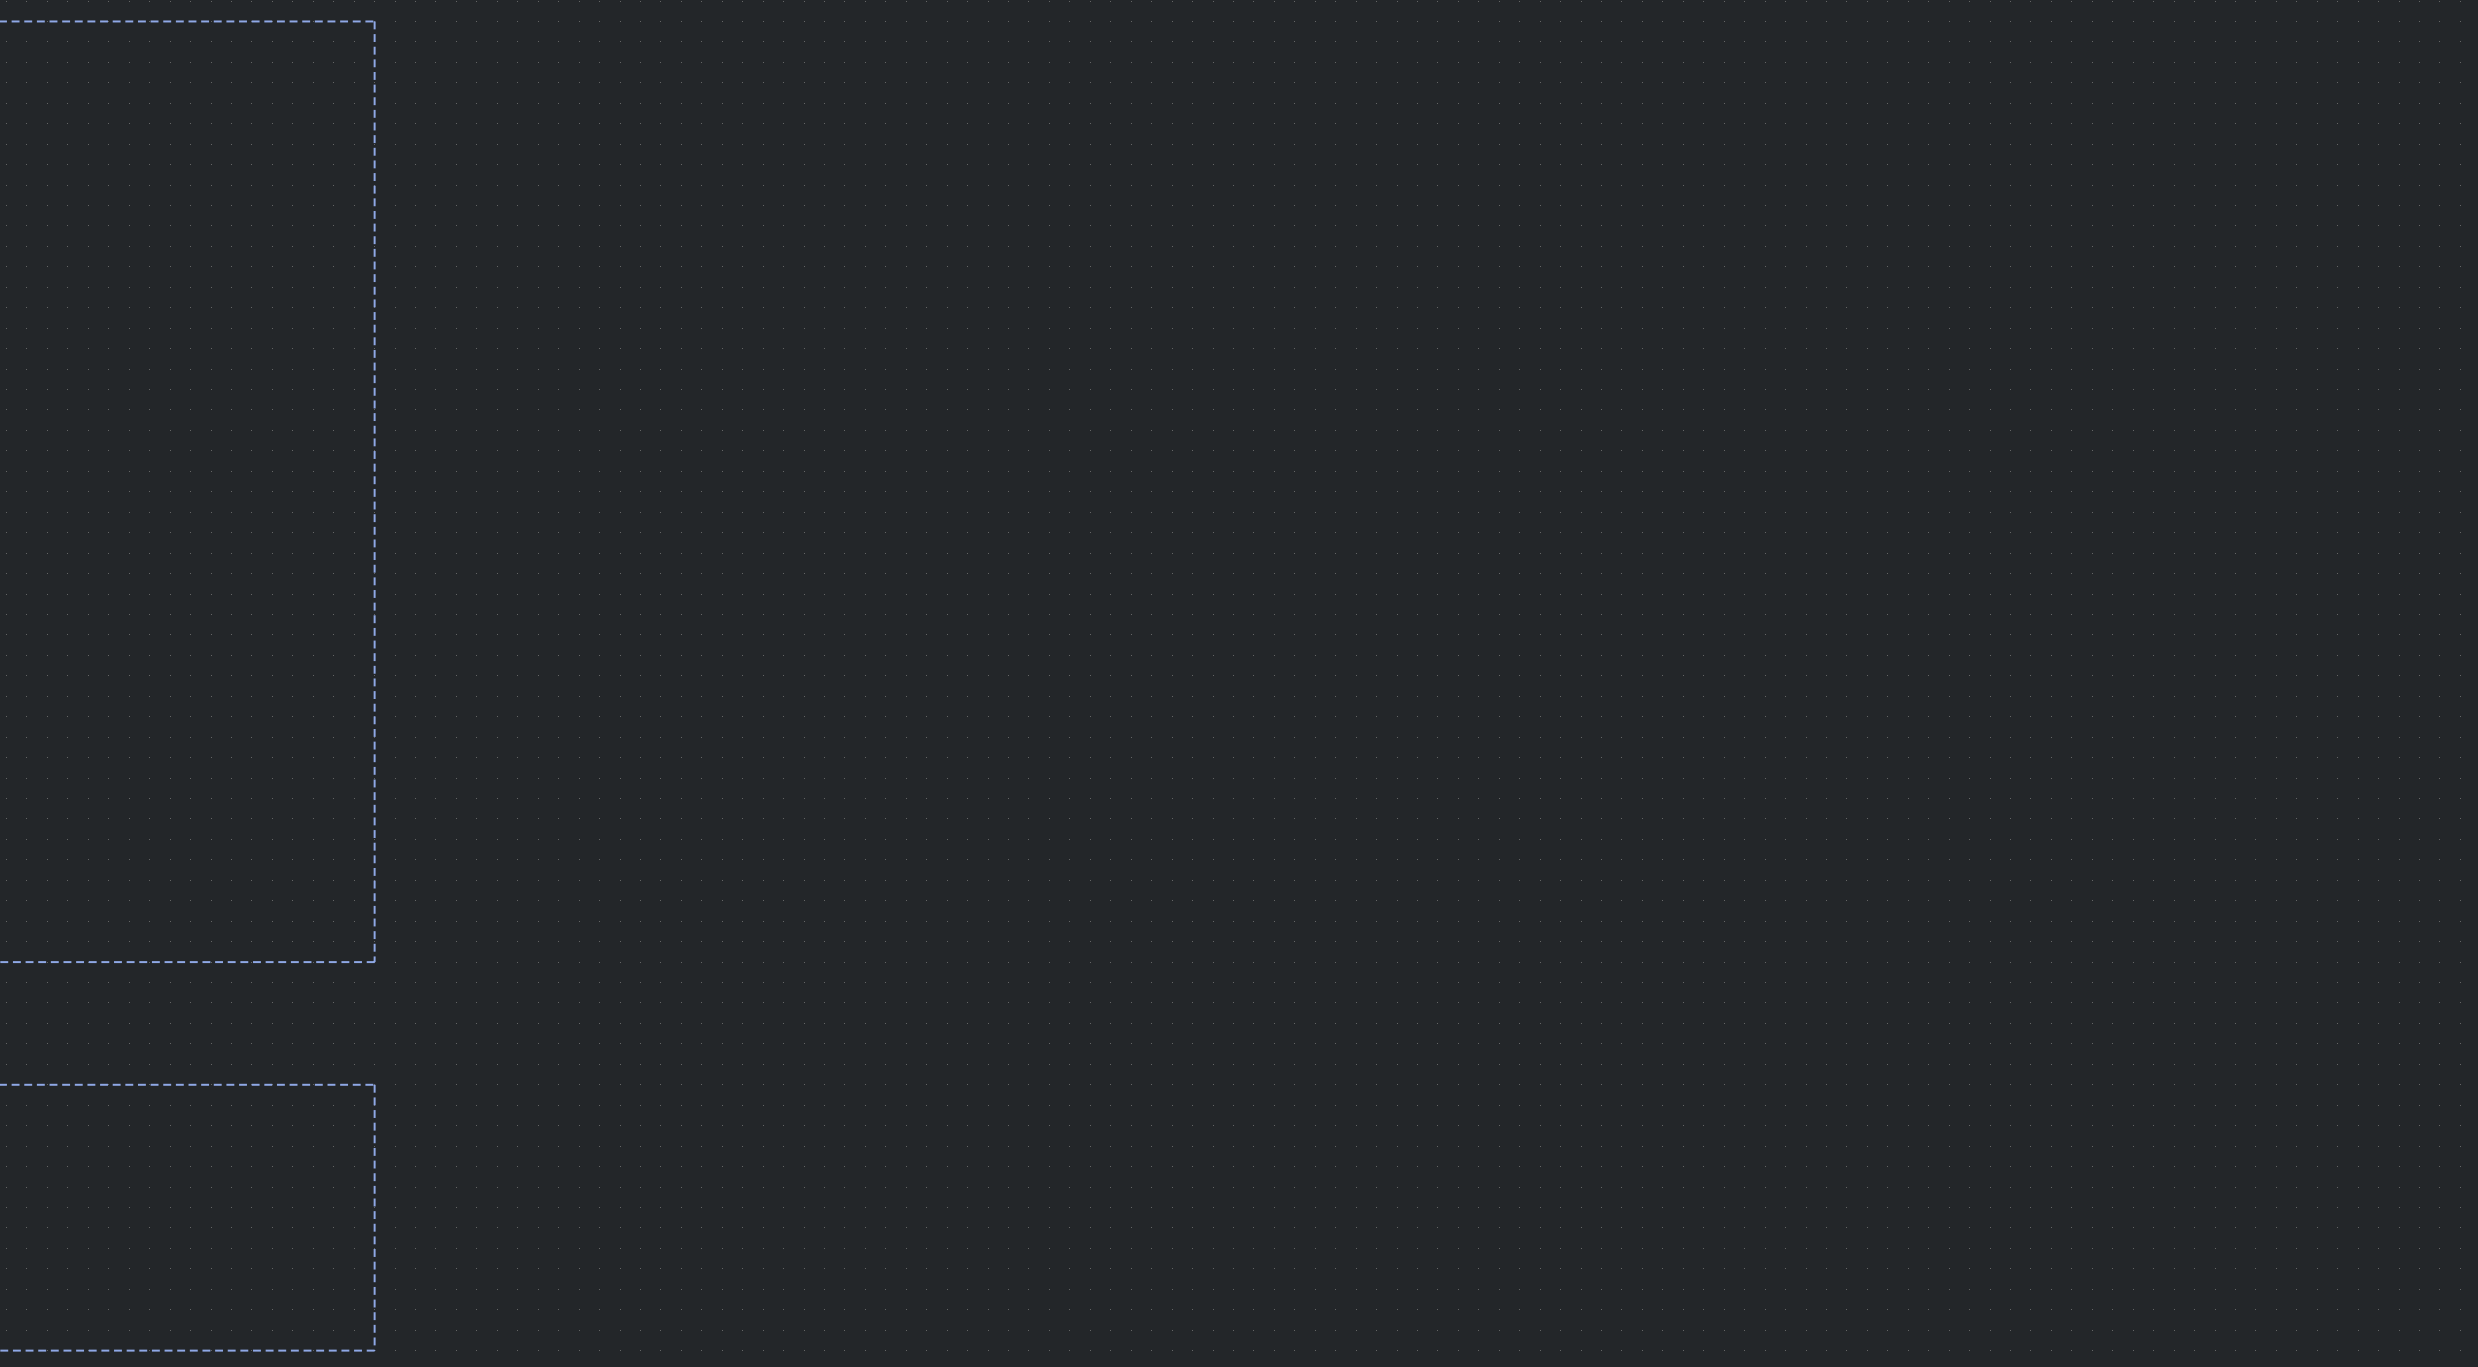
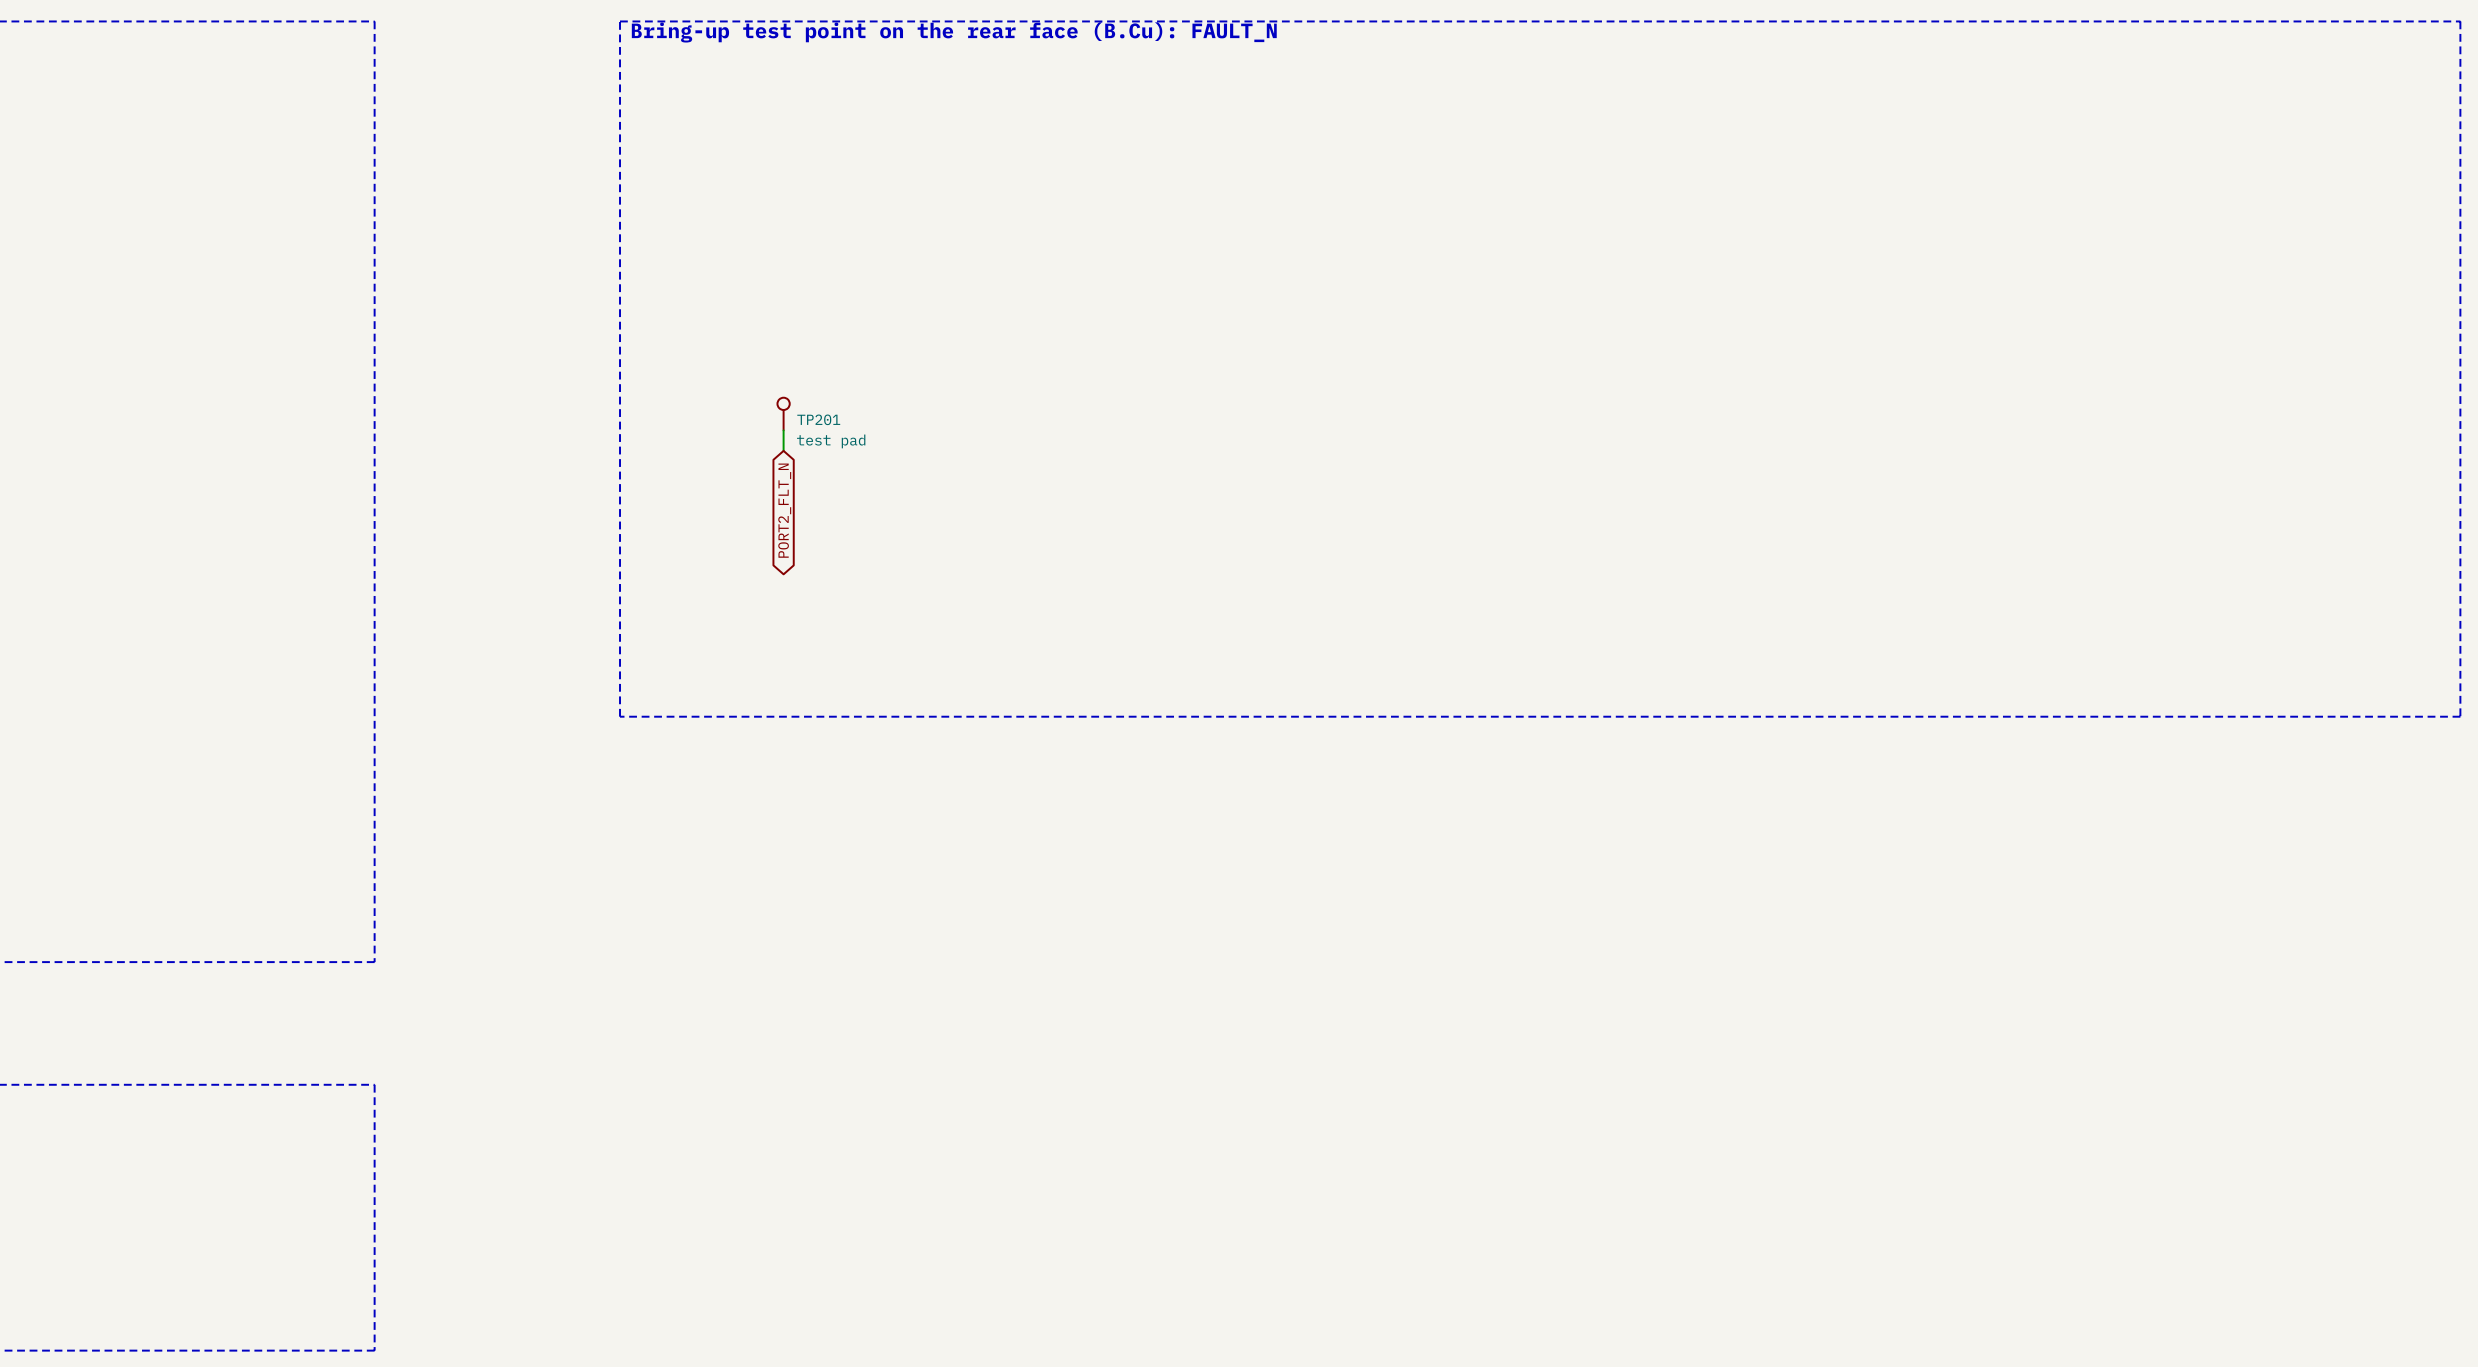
line: none -> (620, 21) (2460, 21) (2460, 716) (620, 716) (620, 21)
text: none -> Bring-up test point on the rear face (B.Cu): FAULT_N (954, 32)
TP201: none -> test pad (783, 414)
wire: none -> (783, 430) (783, 450)
global label: none -> PORT2_FLT_N (784, 510)

